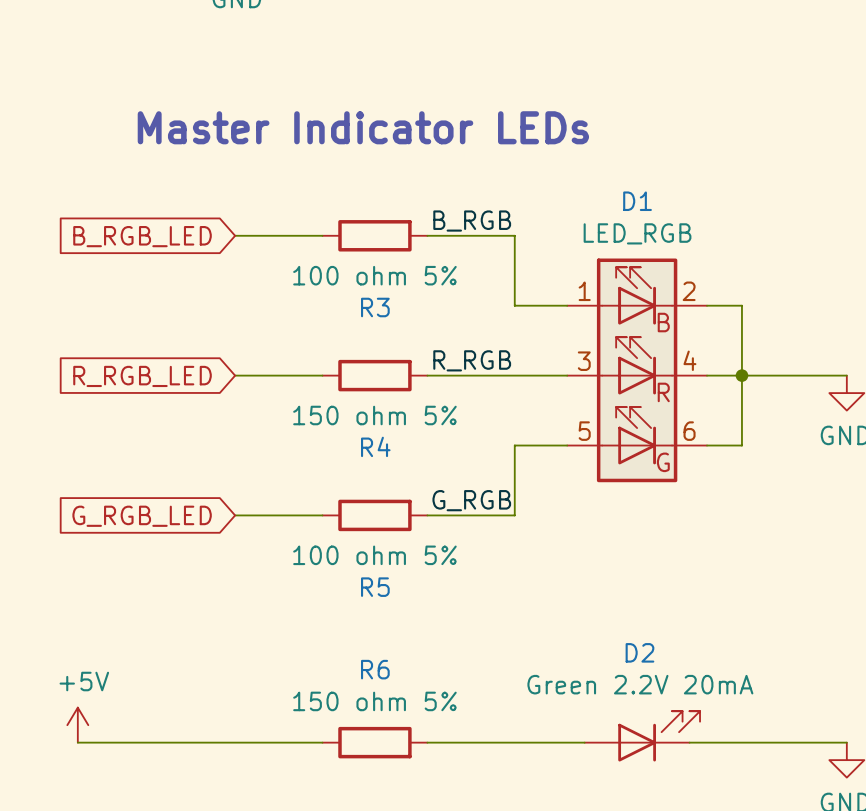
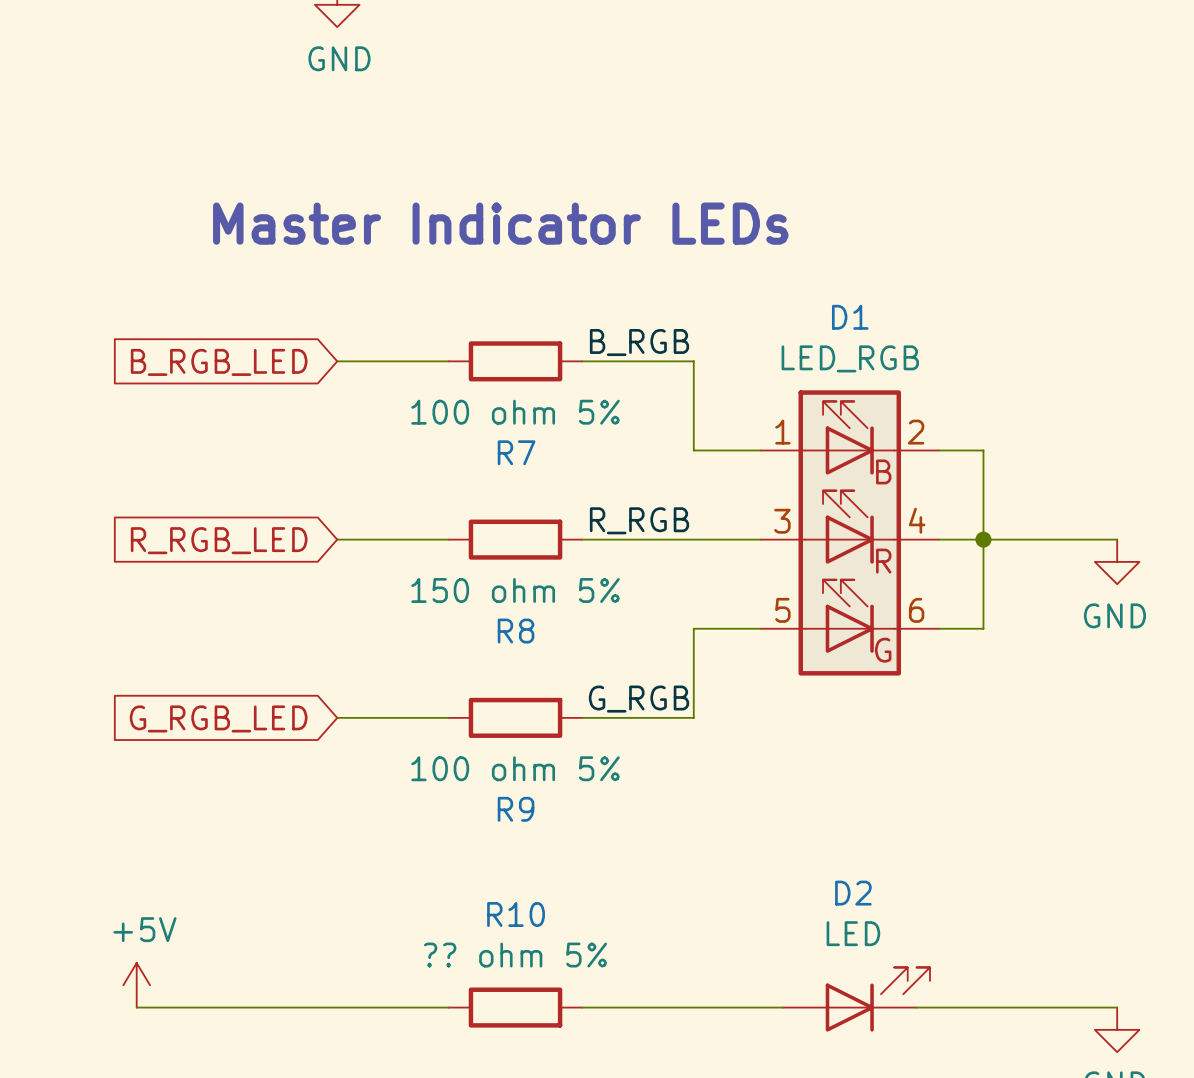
R3 name: R3 (375, 307) -> R7 (516, 452)
R4 name: R4 (375, 446) -> R8 (516, 631)
R5 name: R5 (375, 587) -> R9 (516, 809)
R6 name: R6 (375, 669) -> R10 (516, 914)
D2 value: Green 2.2V 20mA (640, 684) -> LED (853, 933)
R6 value: 150 ohm 5% (374, 701) -> ?? ohm 5% (515, 955)

